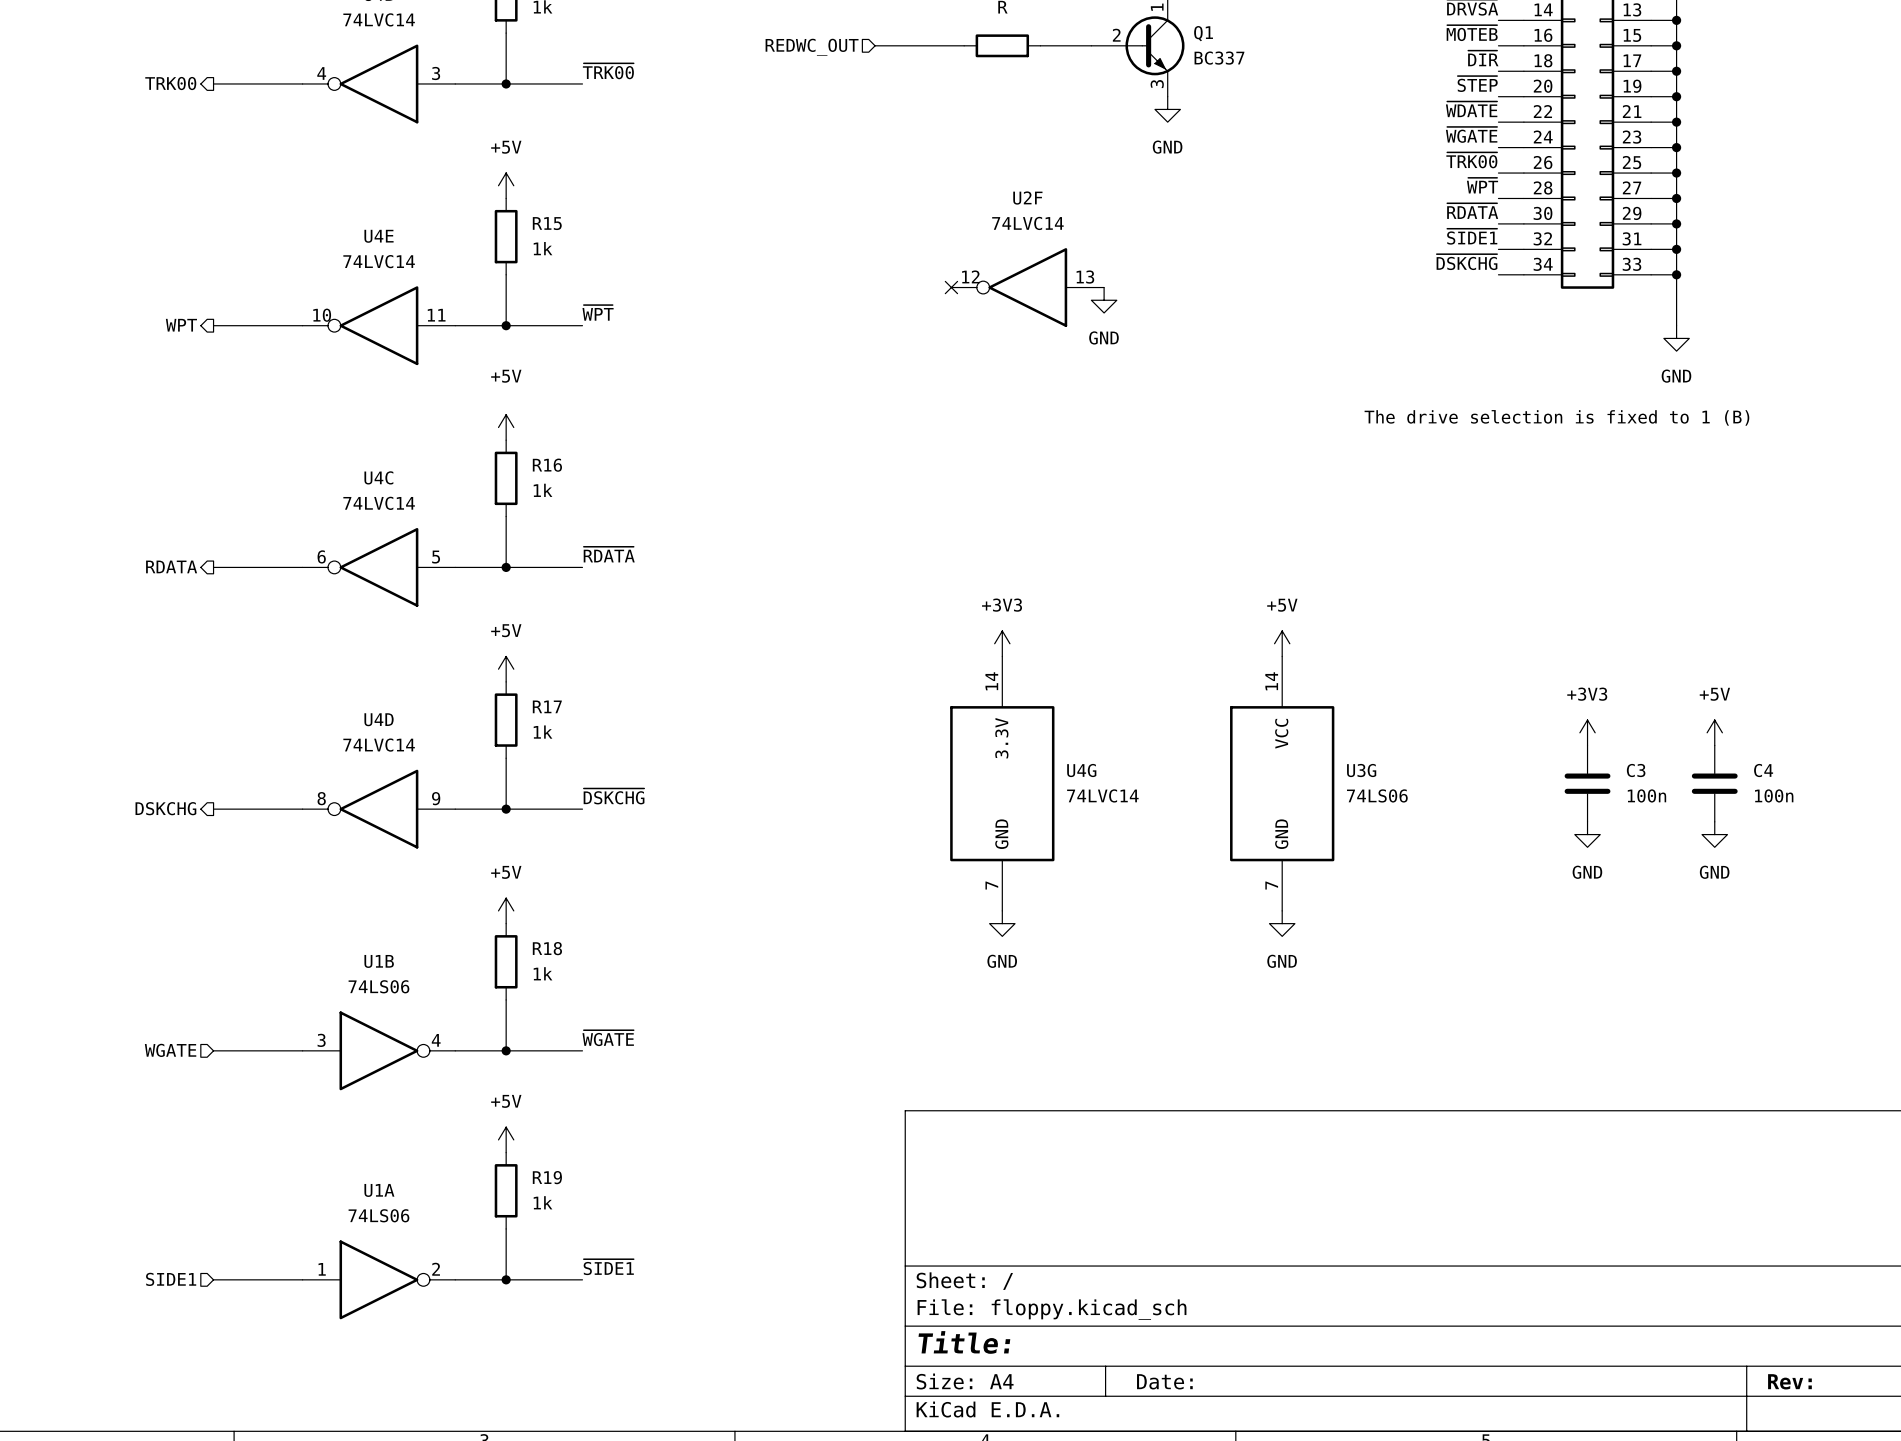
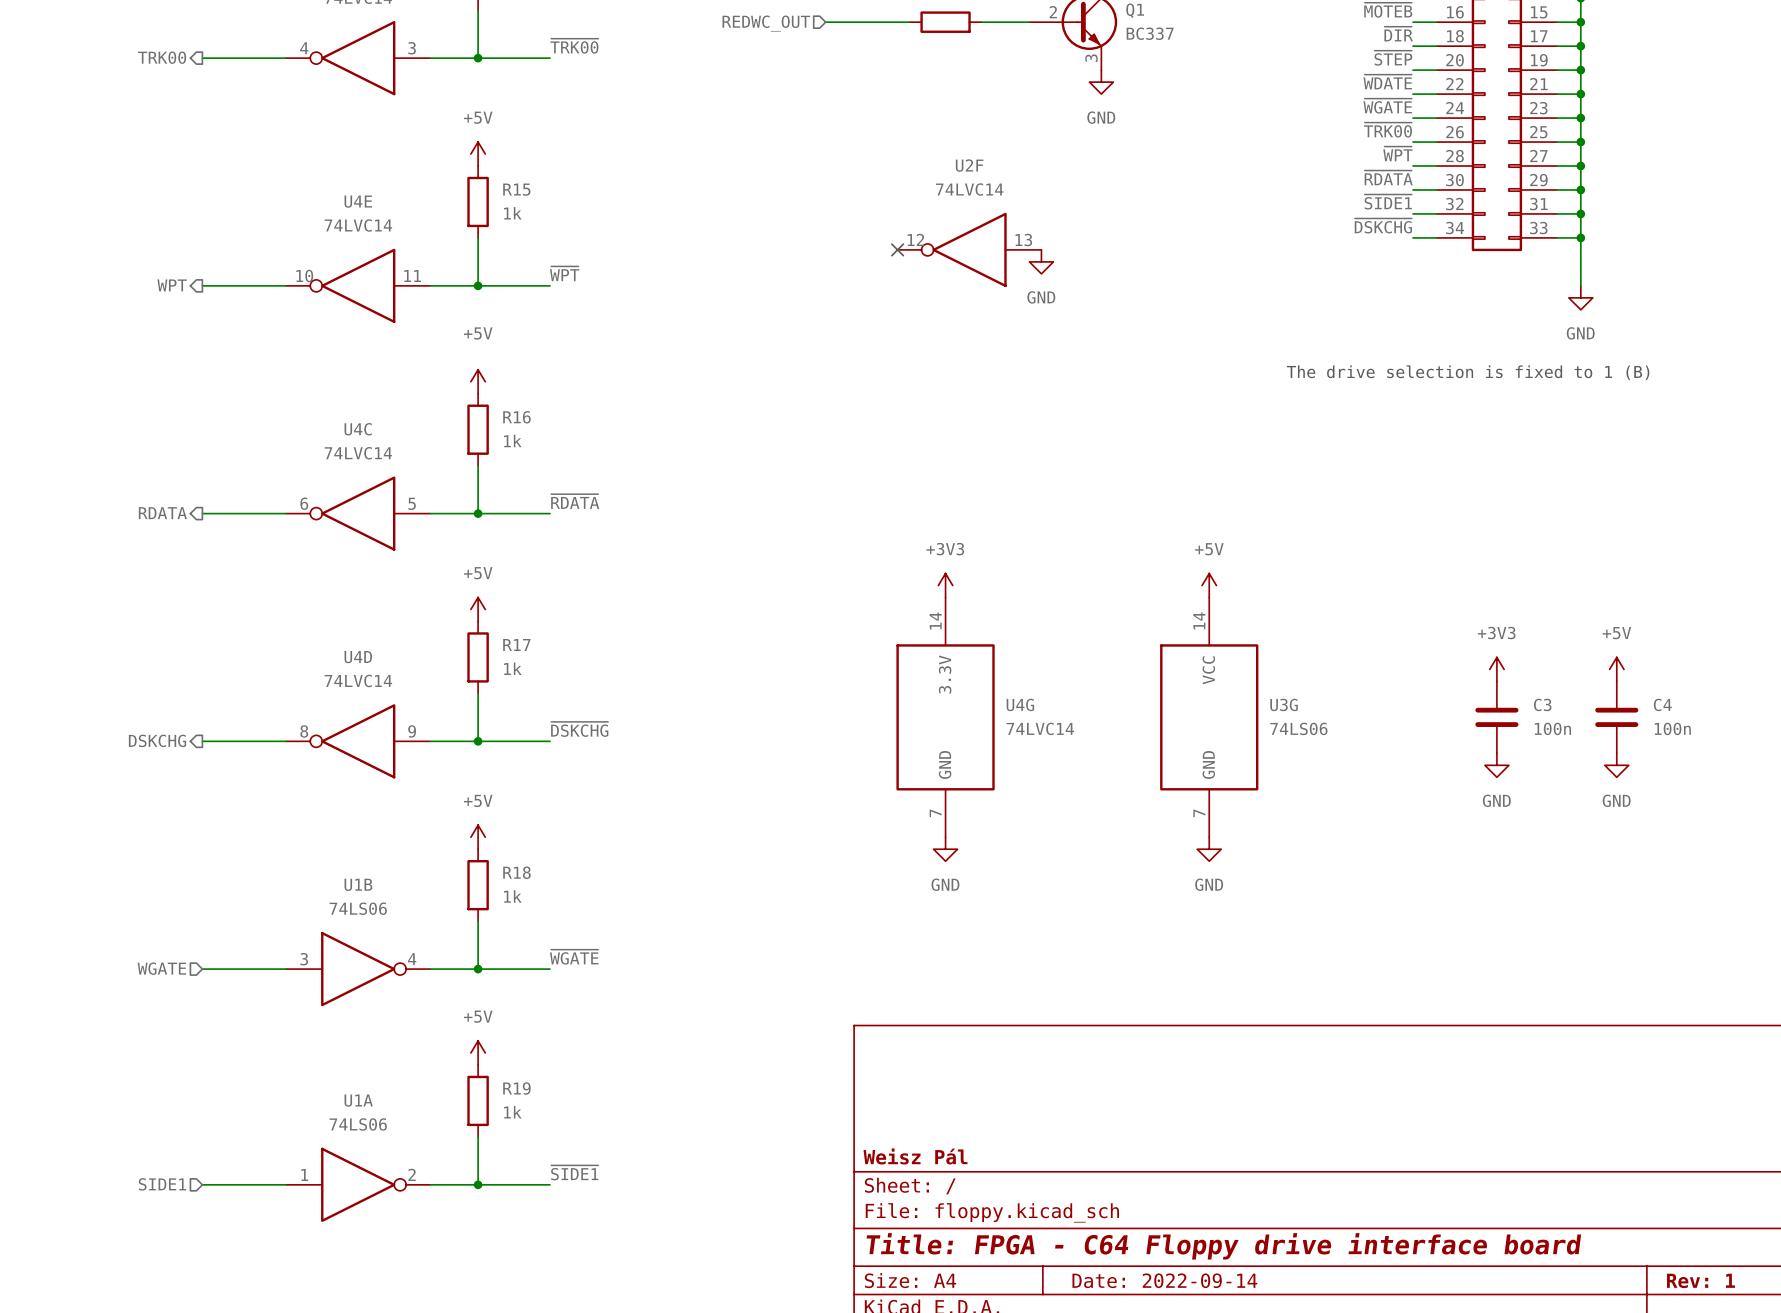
title block: none -> Weisz Pál (915, 1156)
title block: Title: (964, 1342) -> Title: FPGA - C64 Floppy drive interface board (1223, 1246)
title block: Date: (1164, 1381) -> Date: 2022-09-14 (1164, 1280)
title block: Rev: (1789, 1381) -> Rev: 1 (1701, 1280)

